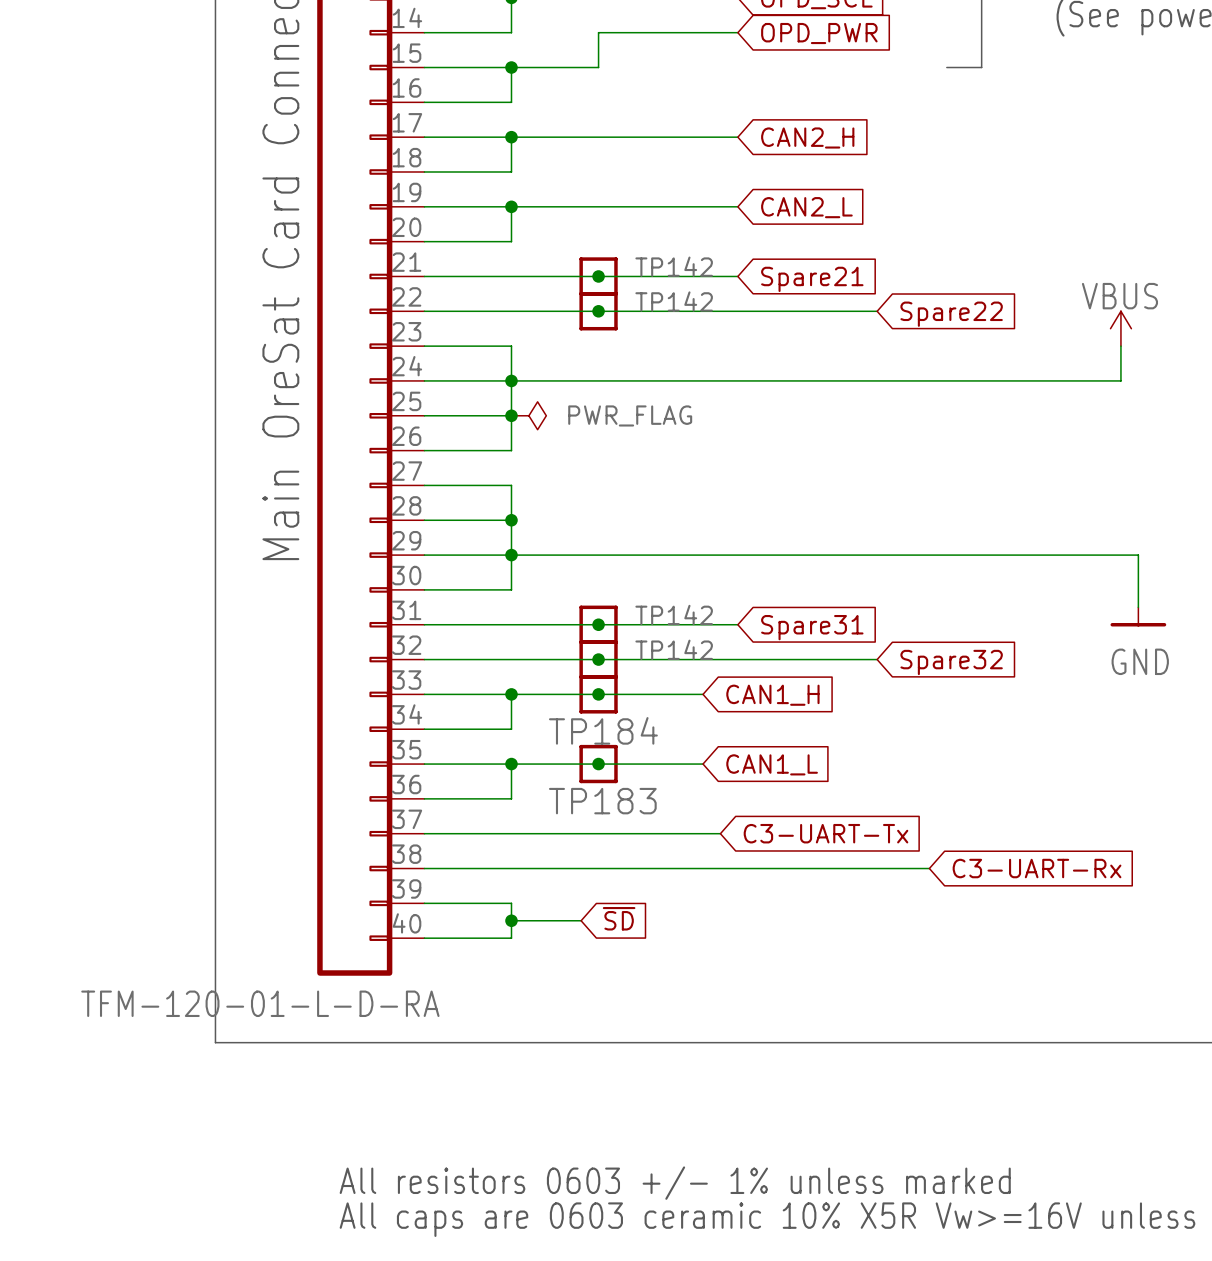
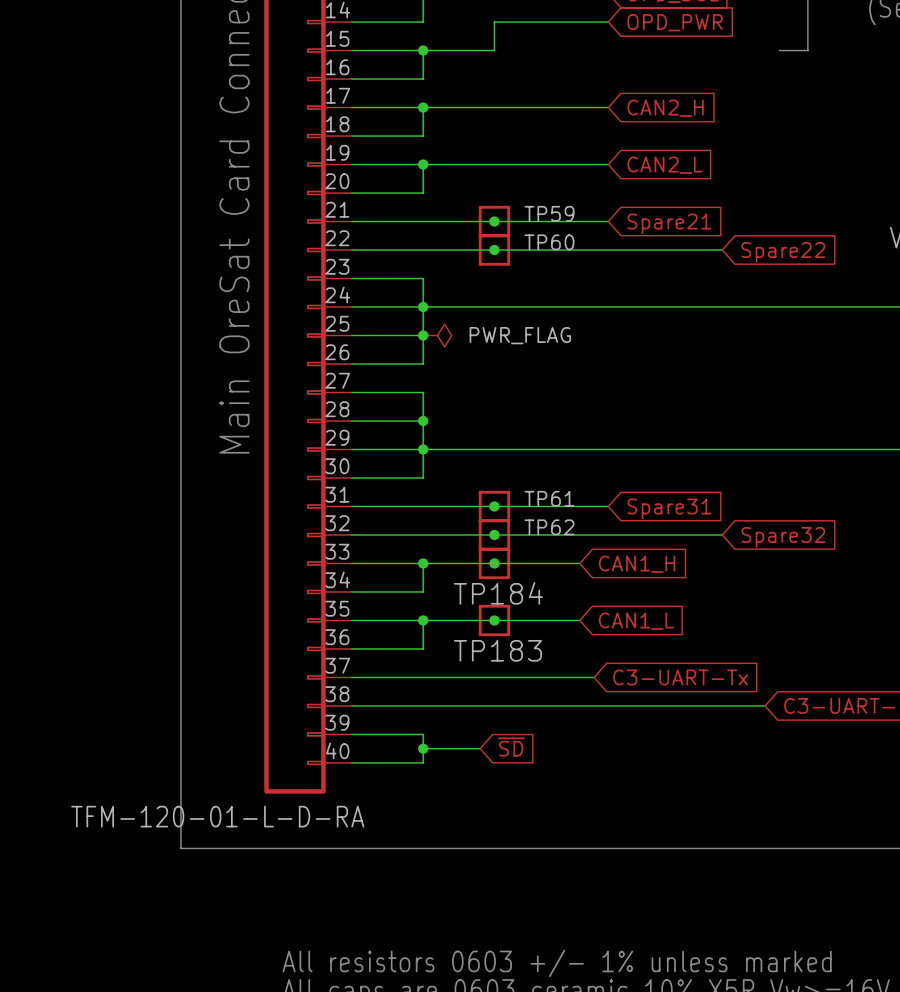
TP142 name: TP142 (674, 266) -> TP59 (549, 213)
TP142 name: TP142 (674, 301) -> TP60 (549, 242)
TP142 name: TP142 (674, 614) -> TP61 (549, 498)
TP142 name: TP142 (674, 649) -> TP62 (549, 527)

